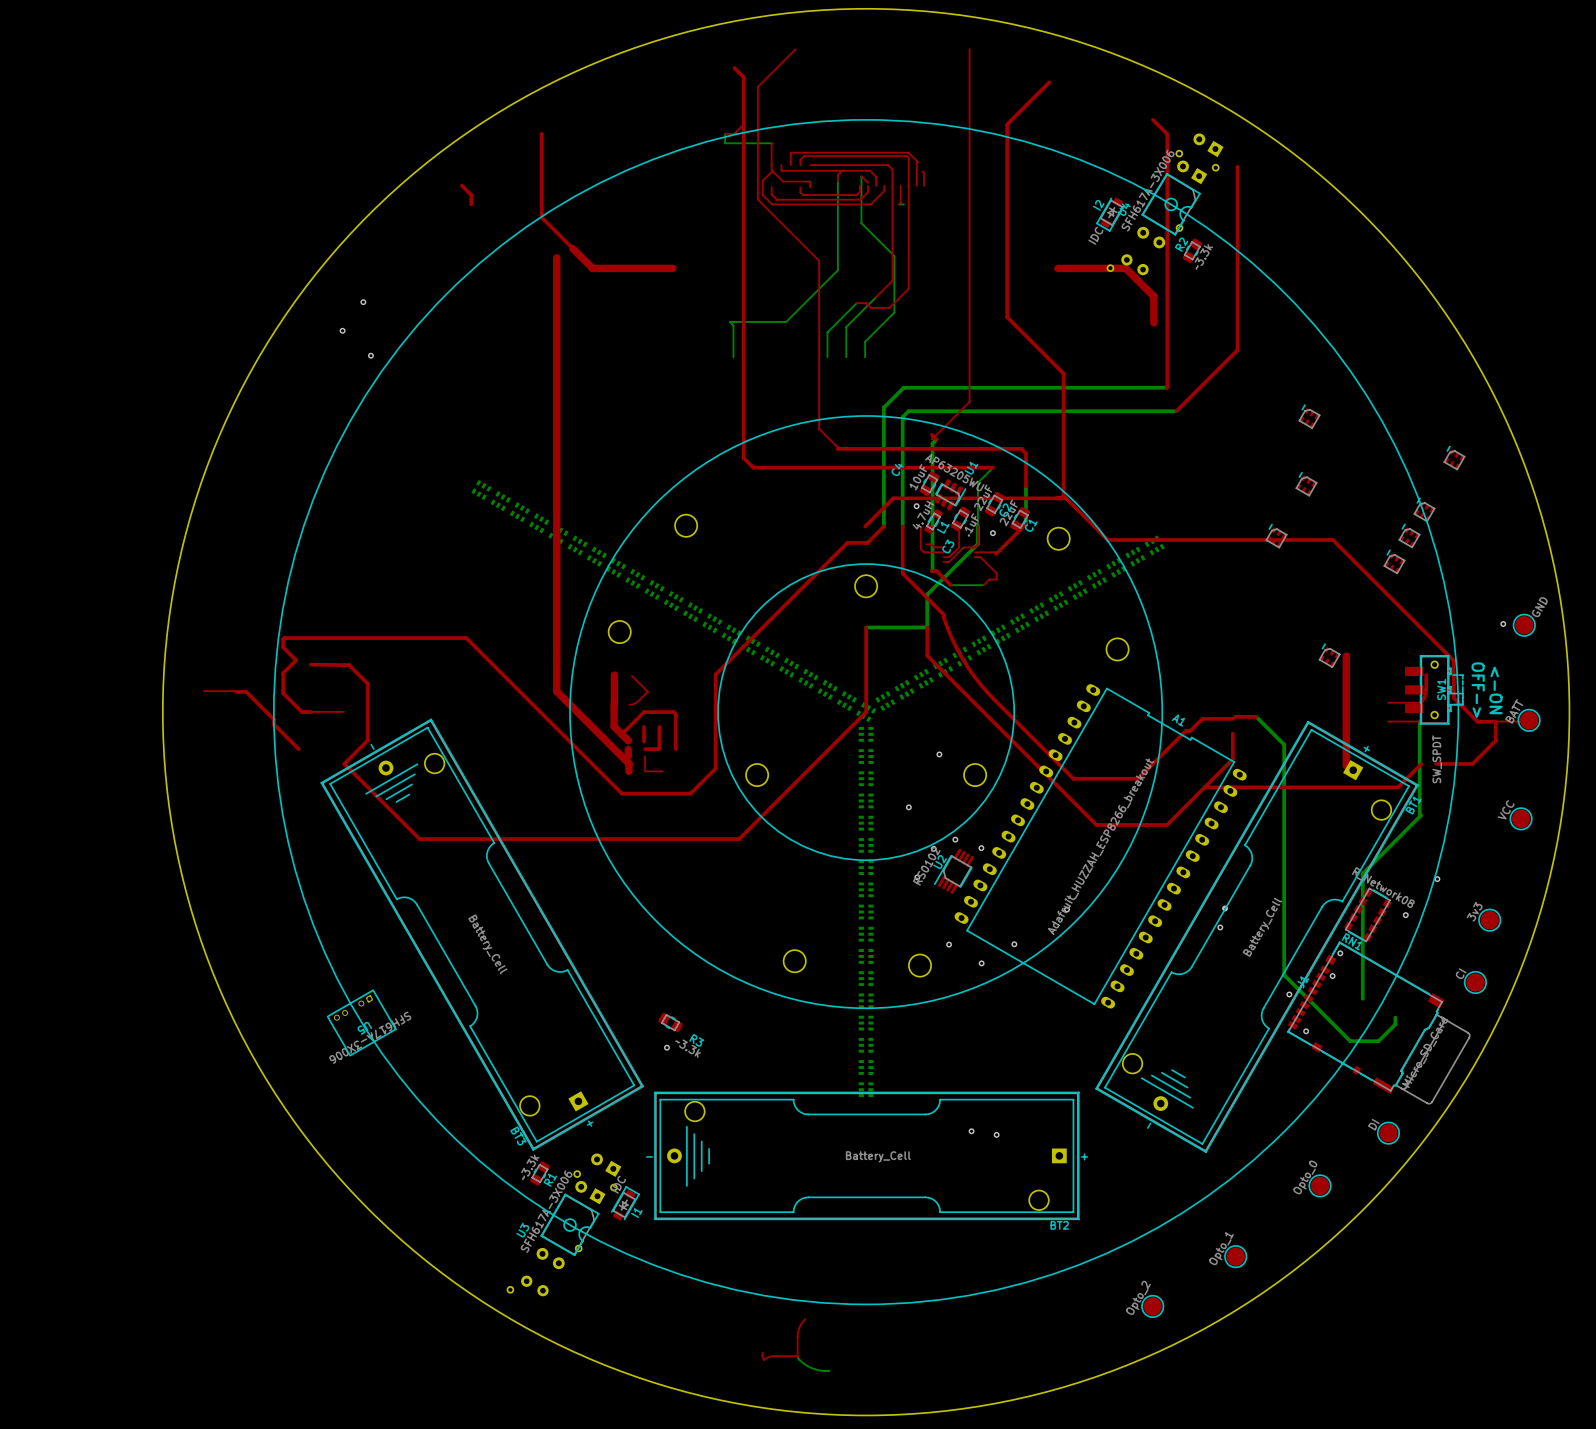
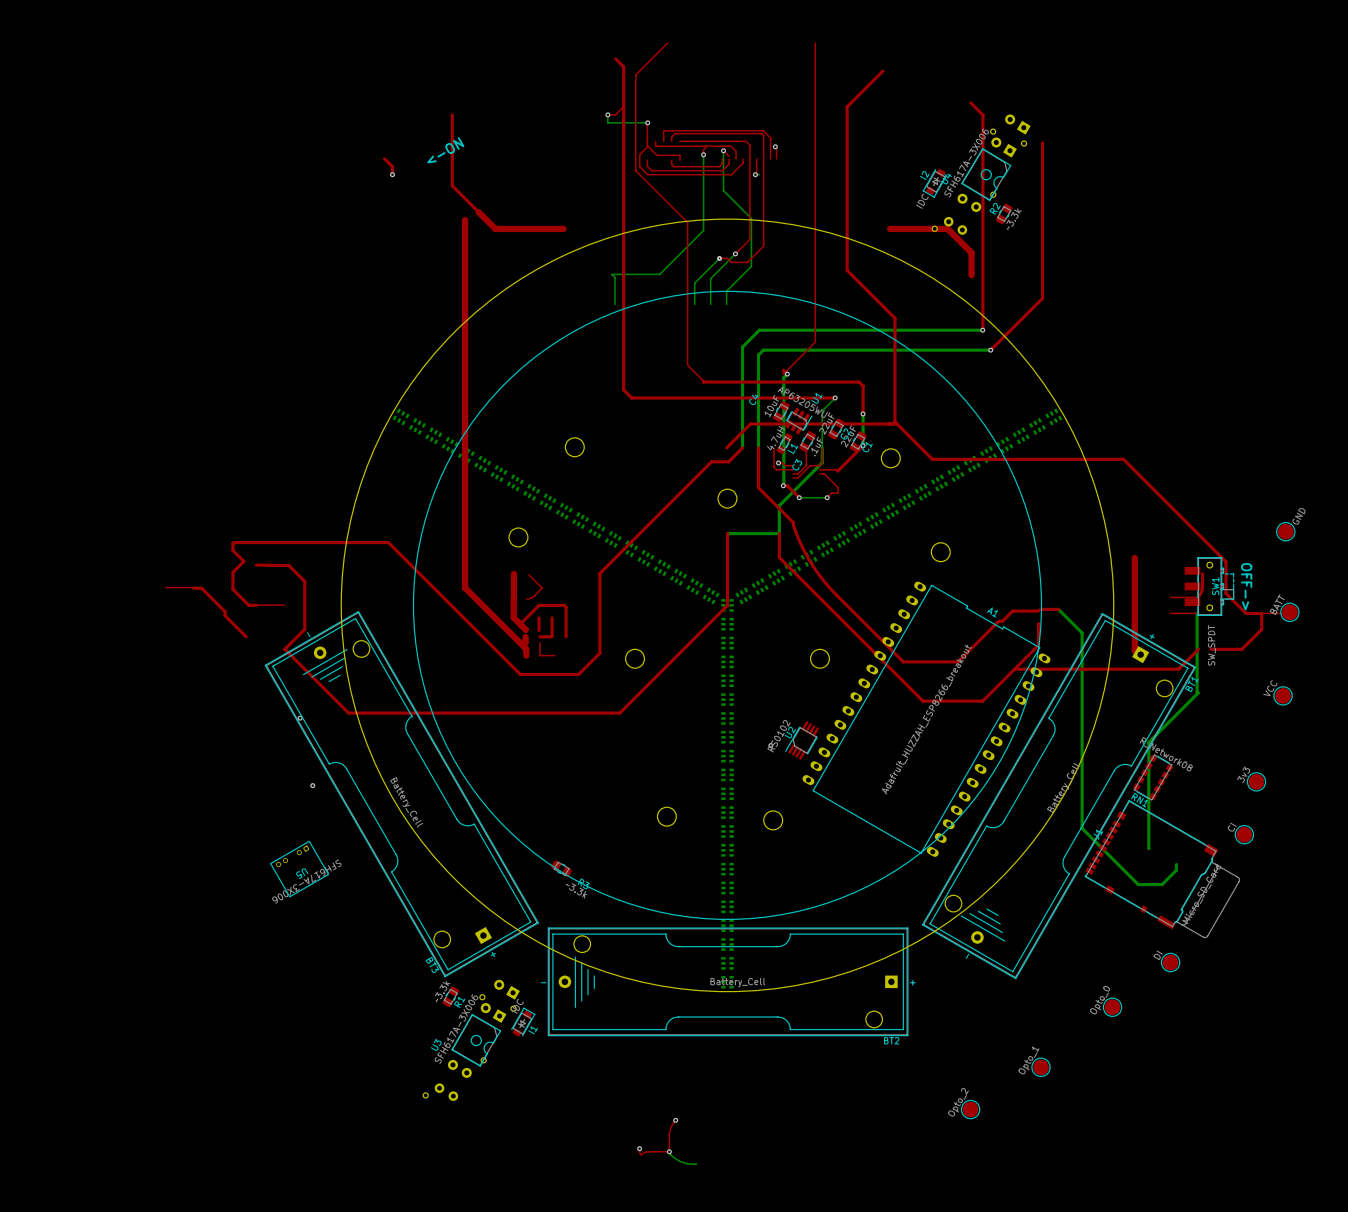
round board edge size: [162, 8, 1570, 1416] -> [340, 218, 1115, 992]
drawing: [273, 119, 1459, 1305] -> none
via: none -> (607, 114)
via: none -> (647, 122)
via: none -> (775, 146)
text: none -> <-ON (445, 150)
via: none -> (723, 150)
via: none -> (703, 154)
via: none -> (392, 174)
via: none -> (755, 174)
via: none -> (735, 253)
via: (363, 302) -> none
via: none -> (719, 258)
via: (342, 330) -> none
drawing: none -> [413, 290, 1042, 920]
via: (370, 355) -> none
via: none -> (982, 330)
via: none -> (990, 350)
part side: top (1309, 416) -> bottom (1021, 435)
via: none -> (787, 374)
part: (1454, 457) -> none
via: none -> (835, 398)
part: (1306, 484) -> none
via: none -> (863, 413)
part: none -> (1053, 416)
part: none -> (1037, 426)
via: (916, 506) -> none
part: (1424, 509) -> none
part: none -> (1004, 445)
via: none -> (863, 445)
via: (992, 533) -> none
part: none -> (988, 454)
part: (1409, 535) -> none
part: (1276, 536) -> none
via: none -> (778, 463)
part: (1394, 561) -> none
via: none -> (783, 485)
via: none -> (799, 497)
via: none -> (827, 497)
via: (1503, 624) -> none
part: (1329, 655) -> none
text: <-ON (1496, 690) -> none
part rotation: 0° (866, 712) -> 60° clockwise (727, 605)
via: (939, 754) -> none
via: (908, 807) -> none
via: (955, 839) -> none
via: none -> (300, 718)
via: (933, 848) -> none
via: (981, 848) -> none
via: (1437, 879) -> none
via: (1225, 908) -> none
via: (1067, 909) -> none
via: (1405, 915) -> none
via: none -> (312, 785)
via: (1220, 927) -> none
via: (949, 944) -> none
via: (1014, 944) -> none
via: (1340, 953) -> none
via: (981, 963) -> none
via: (1332, 976) -> none
via: (1289, 994) -> none
via: (1306, 1031) -> none
via: (666, 1047) -> none
part: none -> (727, 944)
via: (971, 1131) -> none
part: none -> (727, 963)
via: (996, 1134) -> none
part: none -> (727, 982)
via: none -> (675, 1120)
via: none -> (639, 1148)
via: none -> (669, 1151)

